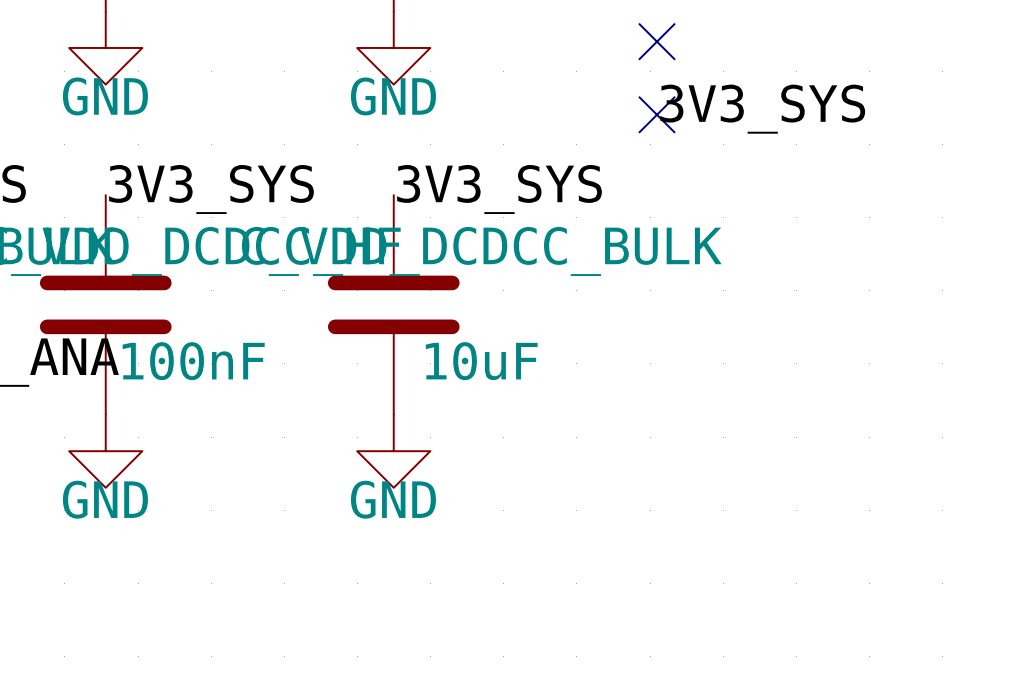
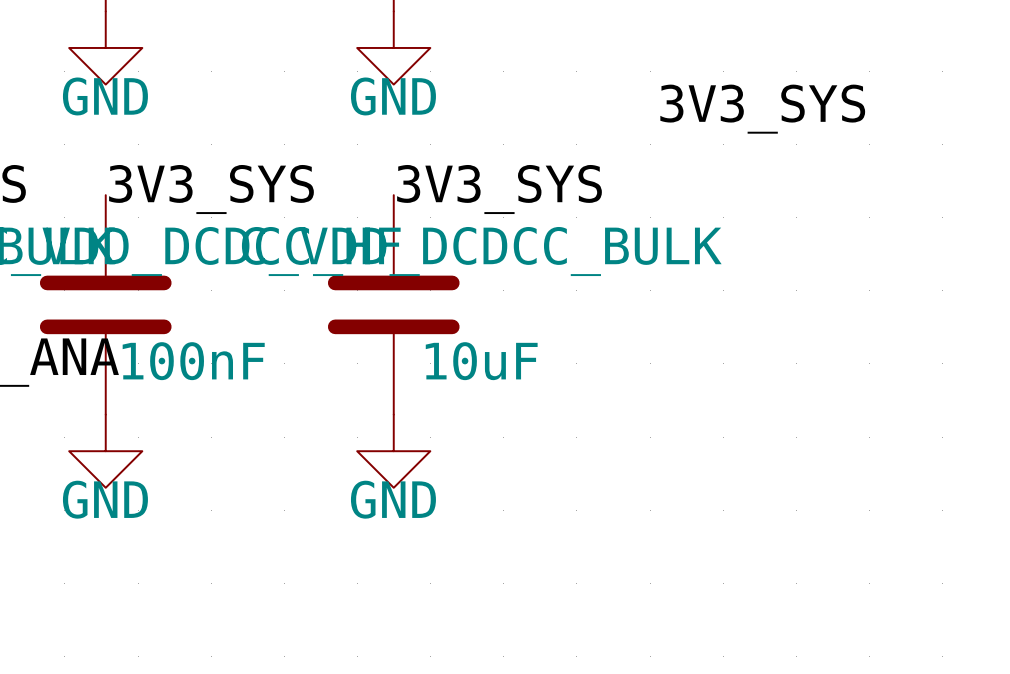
no-connect mark: (657, 41) -> none
no-connect mark: (657, 114) -> none

